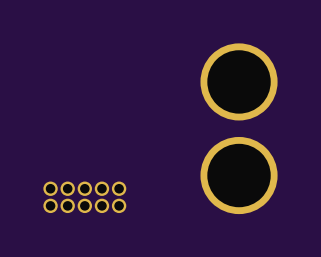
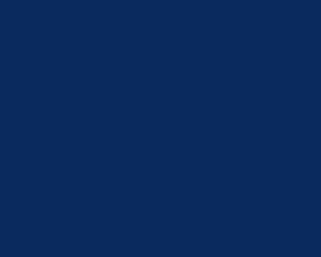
part: (239, 128) -> none
part: (84, 197) -> none

